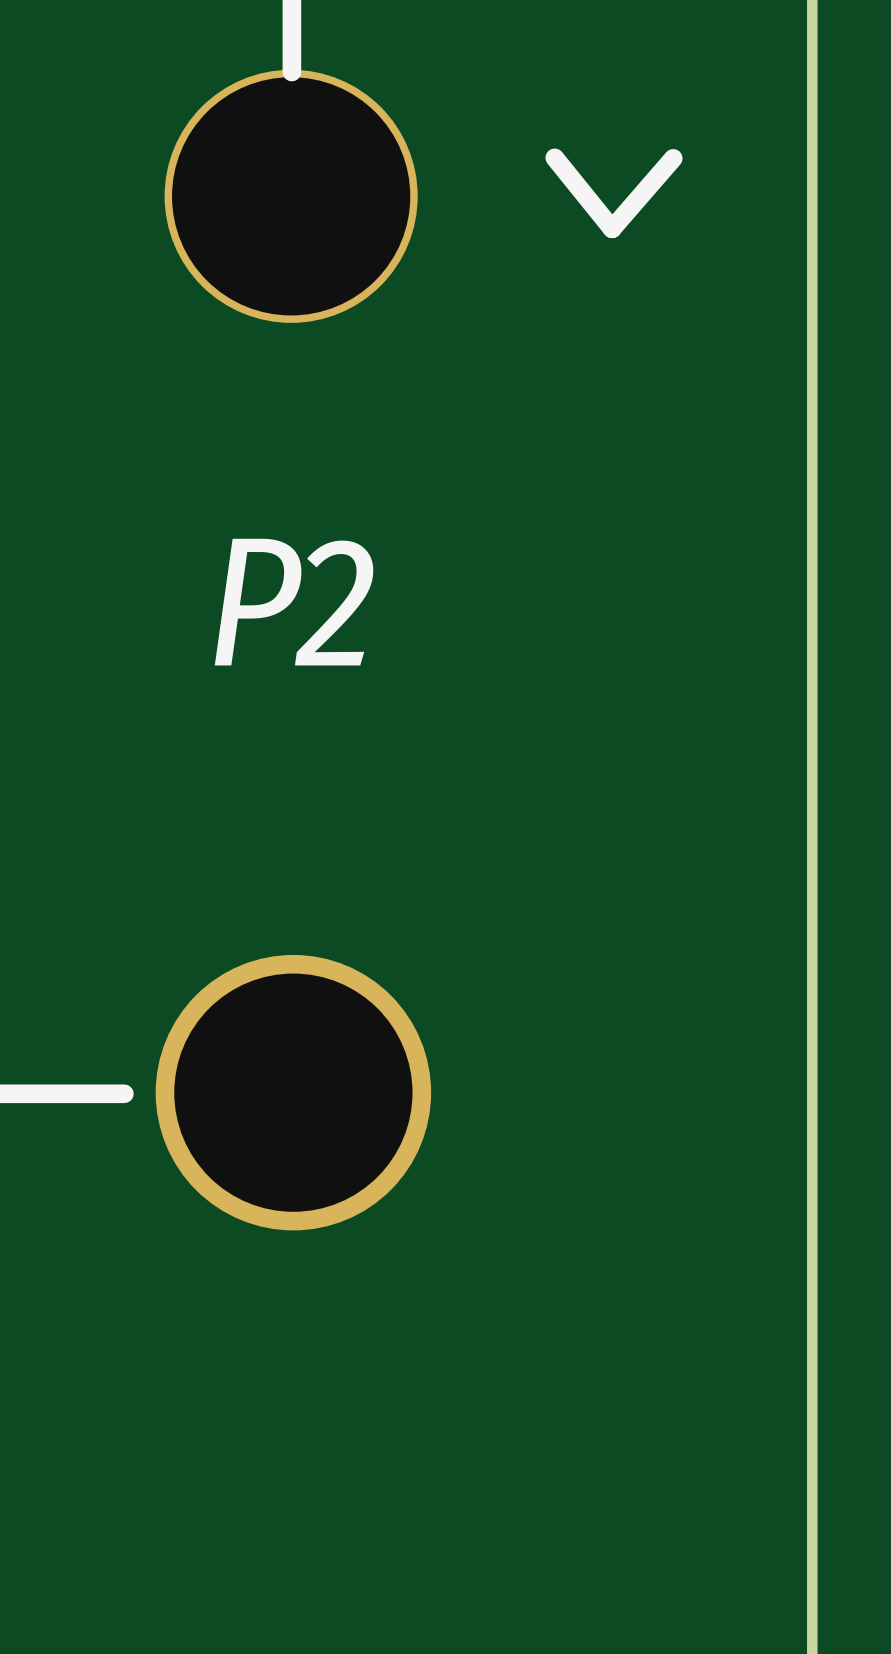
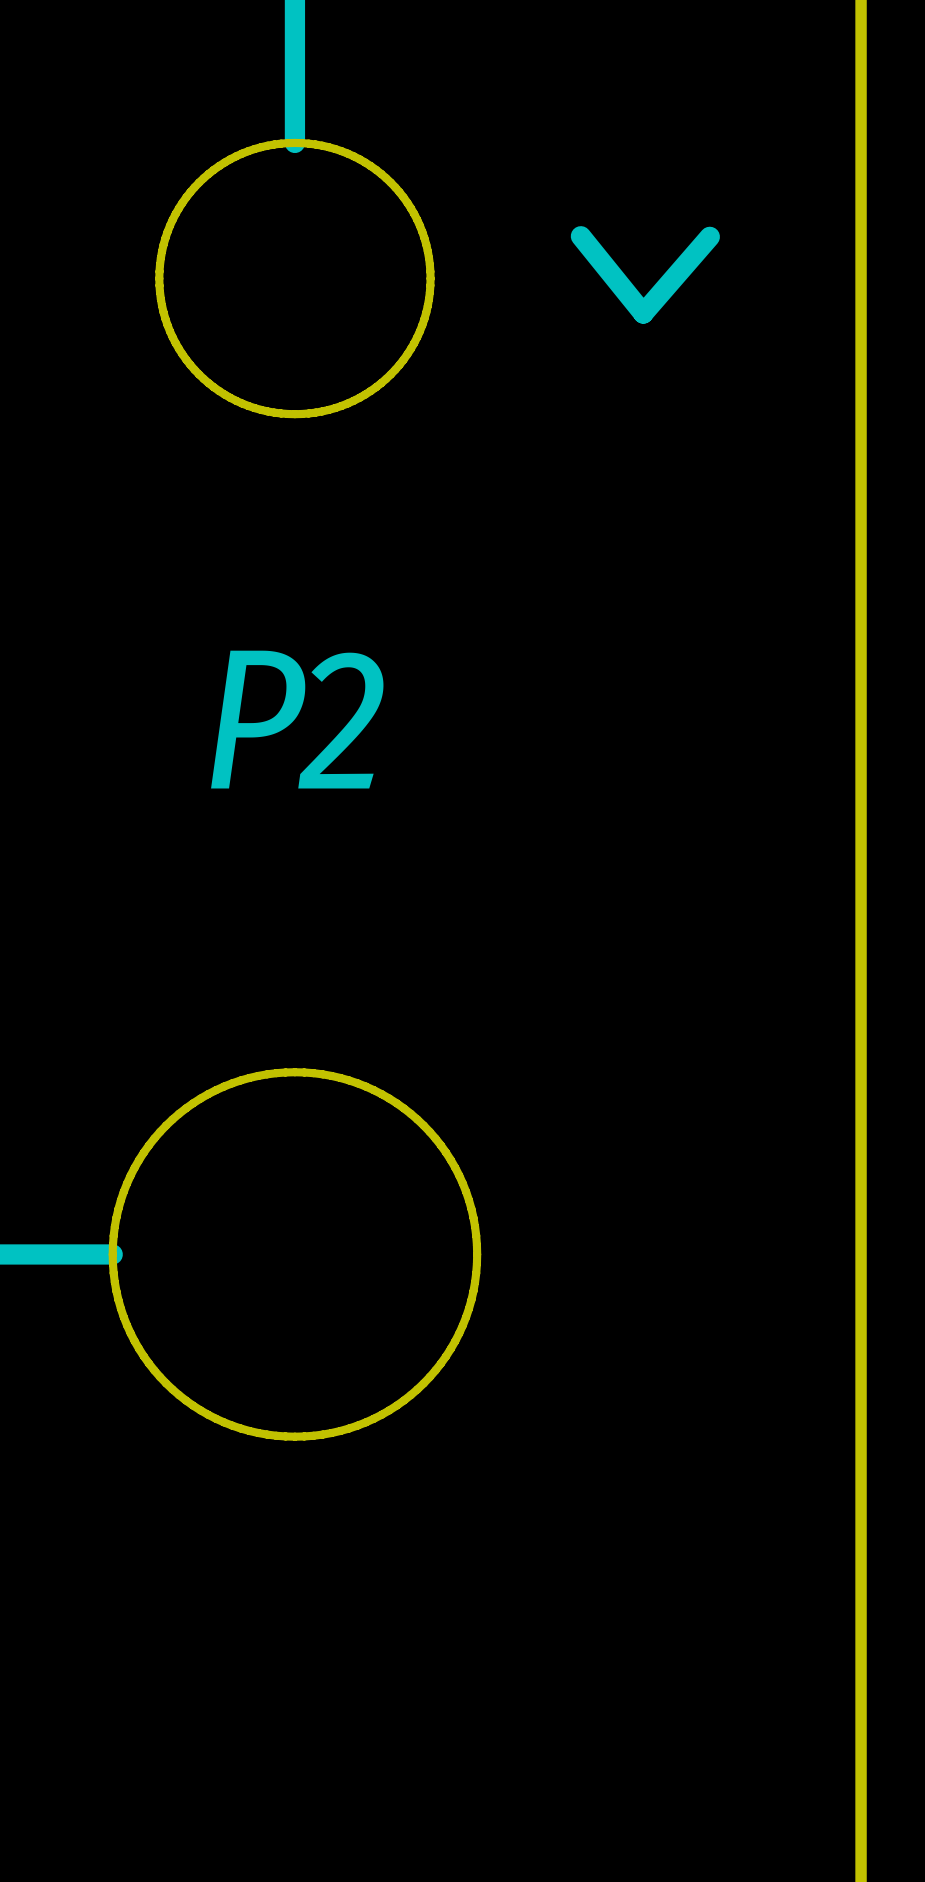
board edge: none -> (294, 142) (267, 145) (242, 153) (219, 166) (199, 182) (182, 202) (169, 225) (162, 251) (159, 278) (162, 305) (169, 331) (182, 354) (199, 374) (219, 391) (242, 403) (267, 411) (294, 414) (322, 411) (347, 403) (370, 391) (390, 374) (407, 354) (419, 331) (427, 305) (430, 278) (427, 251) (419, 225) (407, 202) (390, 182) (370, 166) (347, 153) (322, 145) (294, 142)
part: (291, 196) -> none
board edge: none -> (294, 1072) (258, 1075) (224, 1086) (193, 1103) (166, 1125) (143, 1152) (127, 1183) (116, 1217) (112, 1254) (116, 1291) (127, 1325) (143, 1356) (166, 1383) (193, 1405) (224, 1422) (258, 1432) (294, 1436) (331, 1432) (365, 1422) (396, 1405) (423, 1383) (446, 1356) (462, 1325) (473, 1291) (477, 1254) (473, 1217) (462, 1183) (446, 1152) (423, 1125) (396, 1103) (365, 1086) (331, 1075) (294, 1072)
part: (293, 1092) -> none

